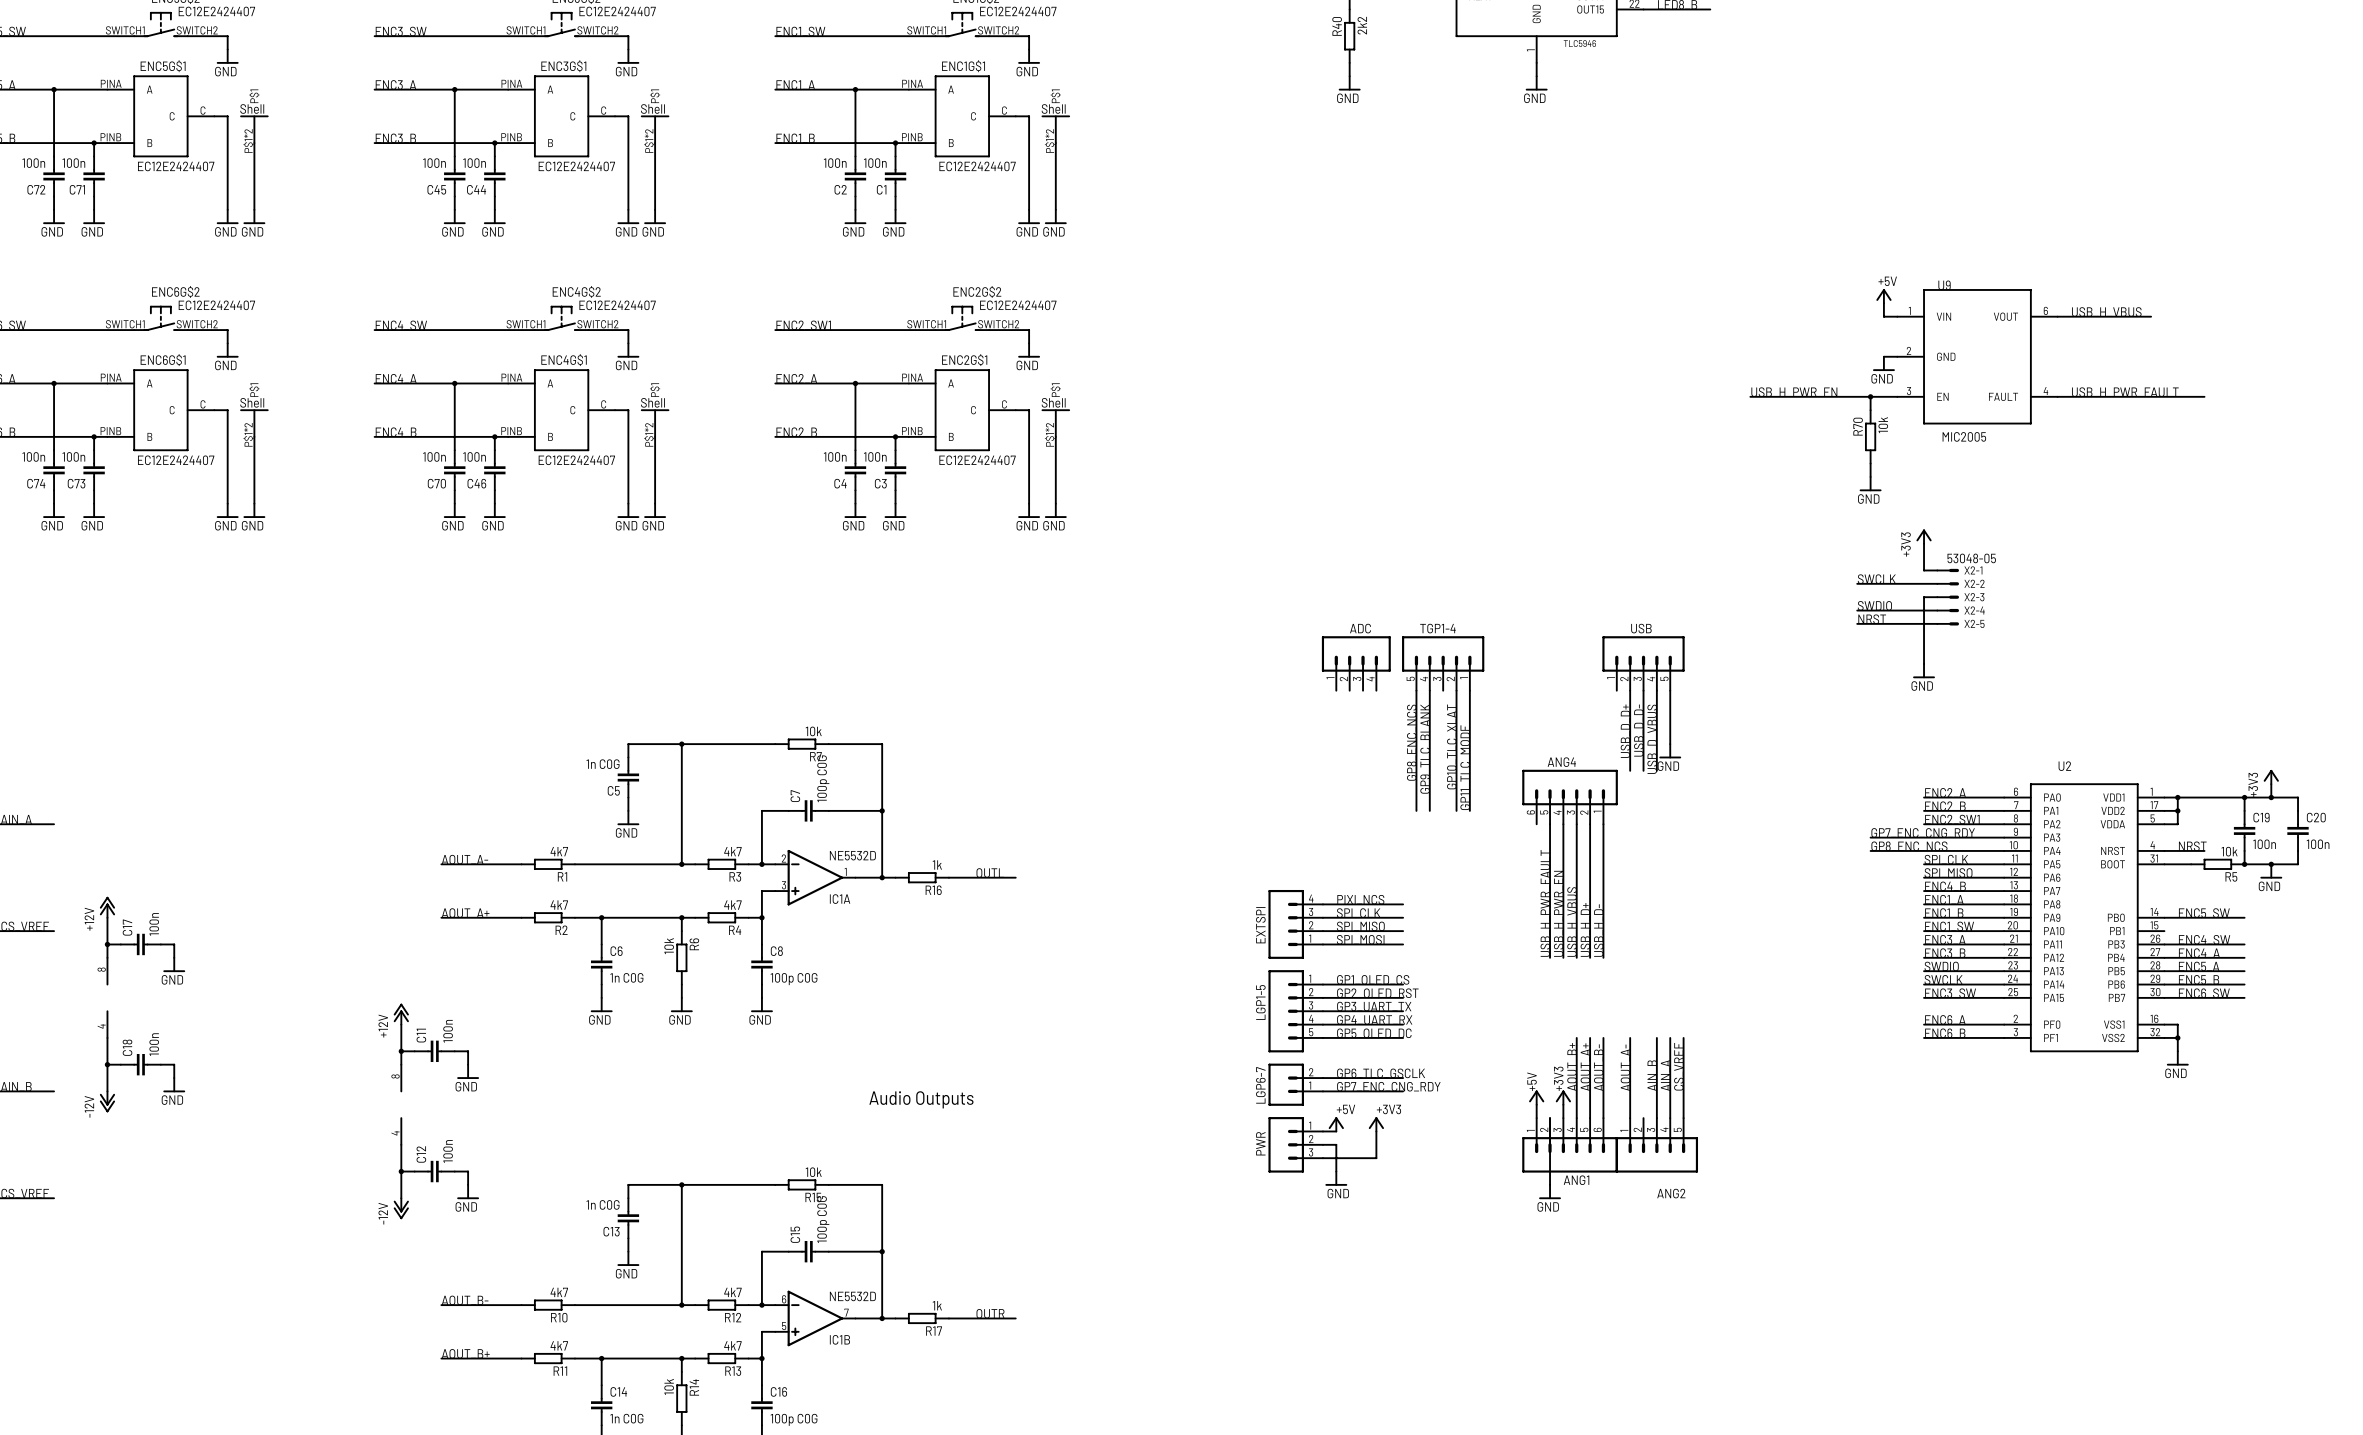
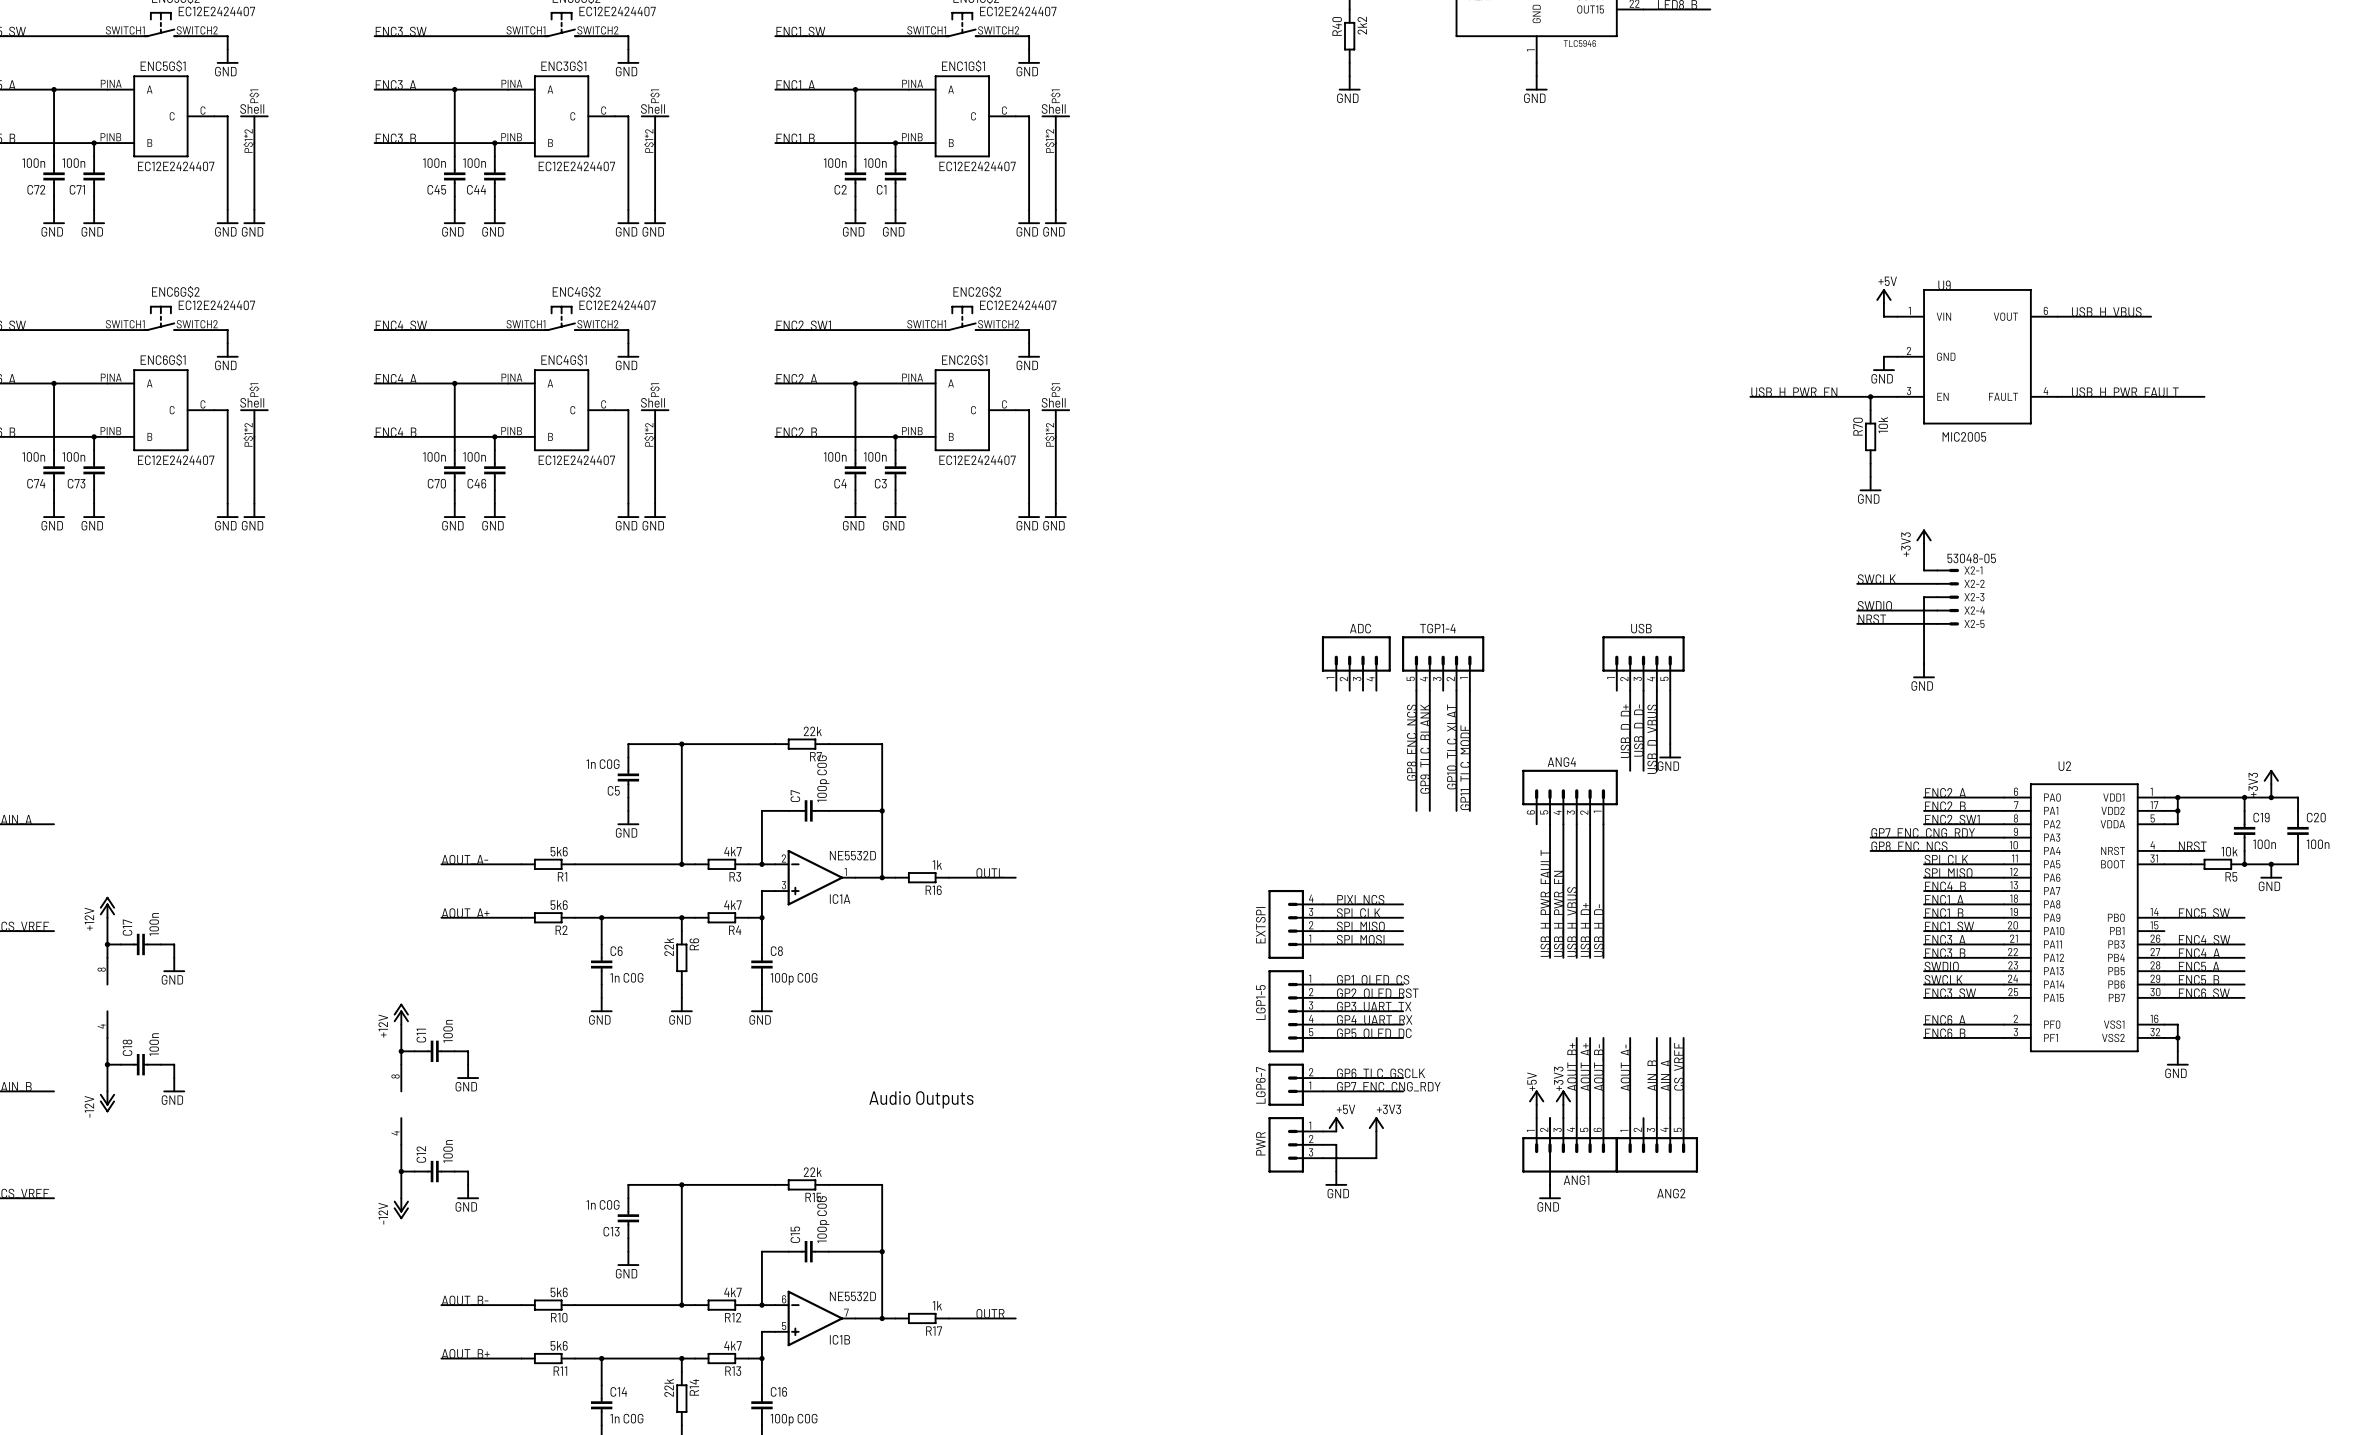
R7 value: 10k (813, 731) -> 22k (812, 731)
R1 value: 4k7 (559, 851) -> 5k6 (559, 851)
R2 value: 4k7 (559, 905) -> 5k6 (559, 905)
R6 value: 10k (669, 946) -> 22k (669, 947)
R15 value: 10k (813, 1172) -> 22k (812, 1172)
R10 value: 4k7 (559, 1292) -> 5k6 (559, 1292)
R11 value: 4k7 (559, 1345) -> 5k6 (559, 1345)
R14 value: 10k (669, 1386) -> 22k (669, 1387)

